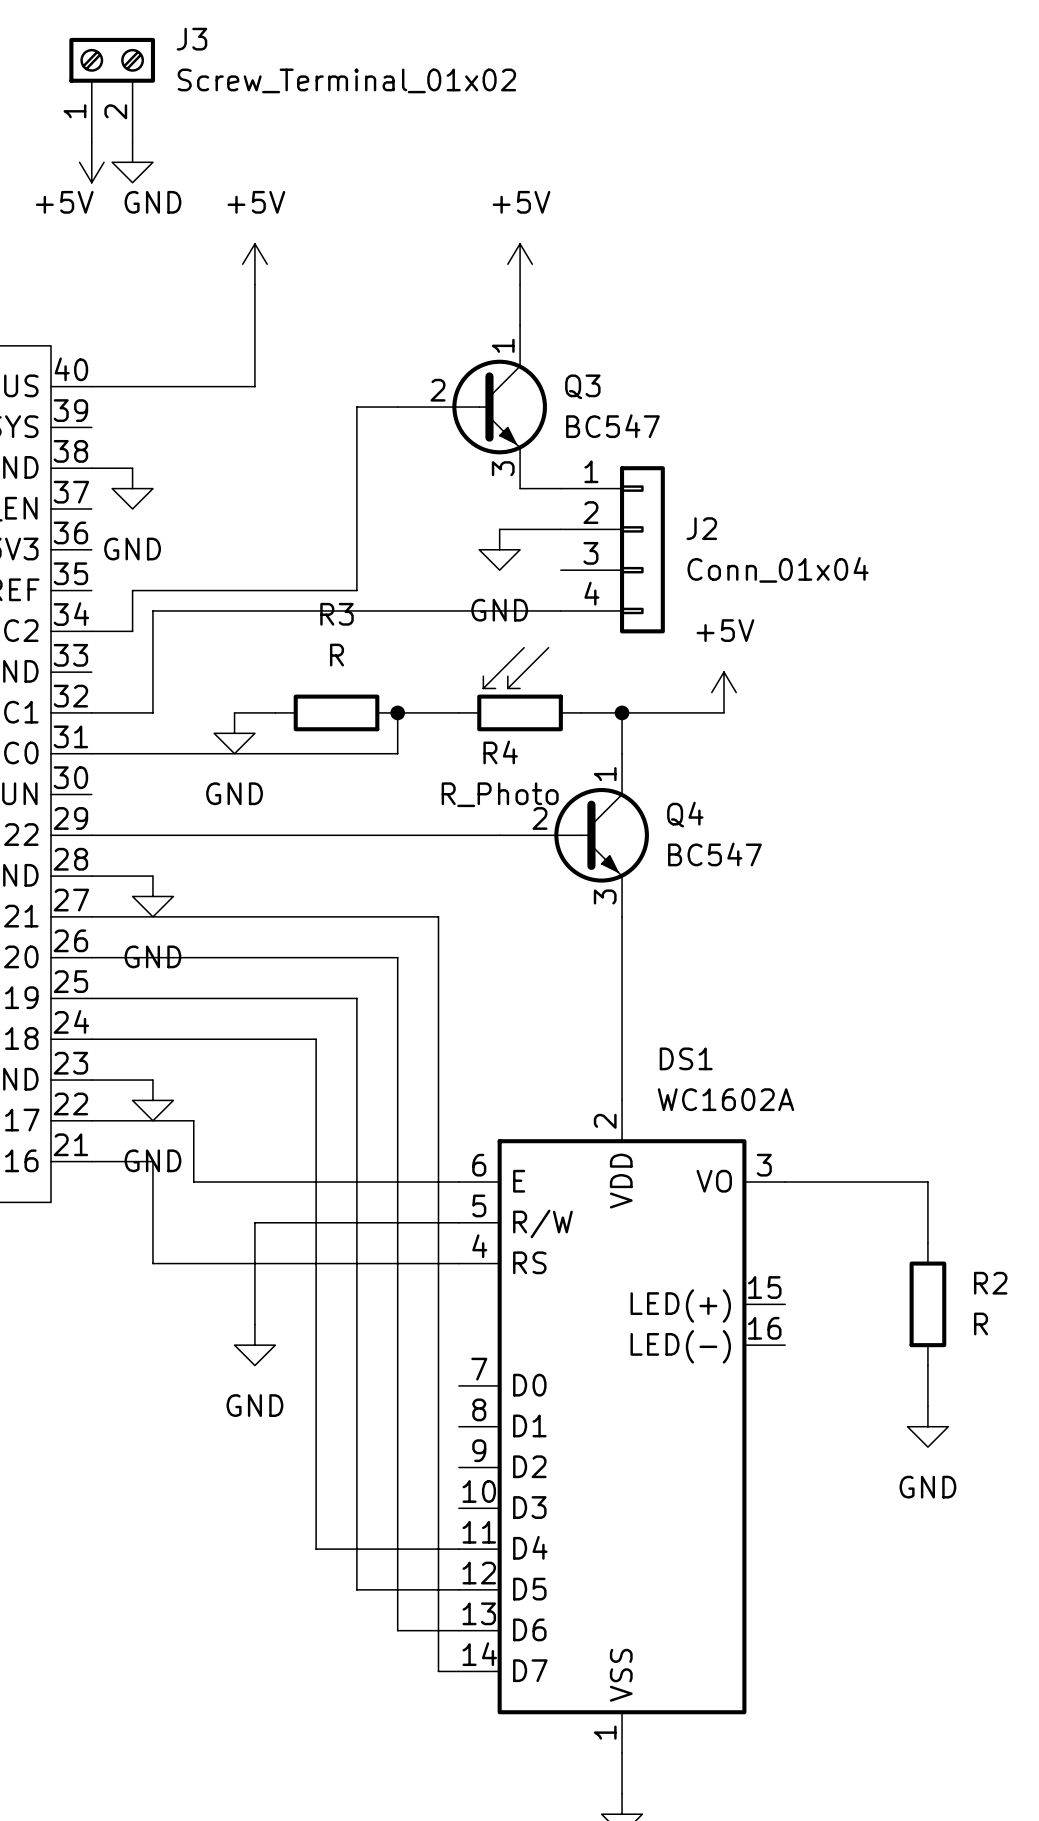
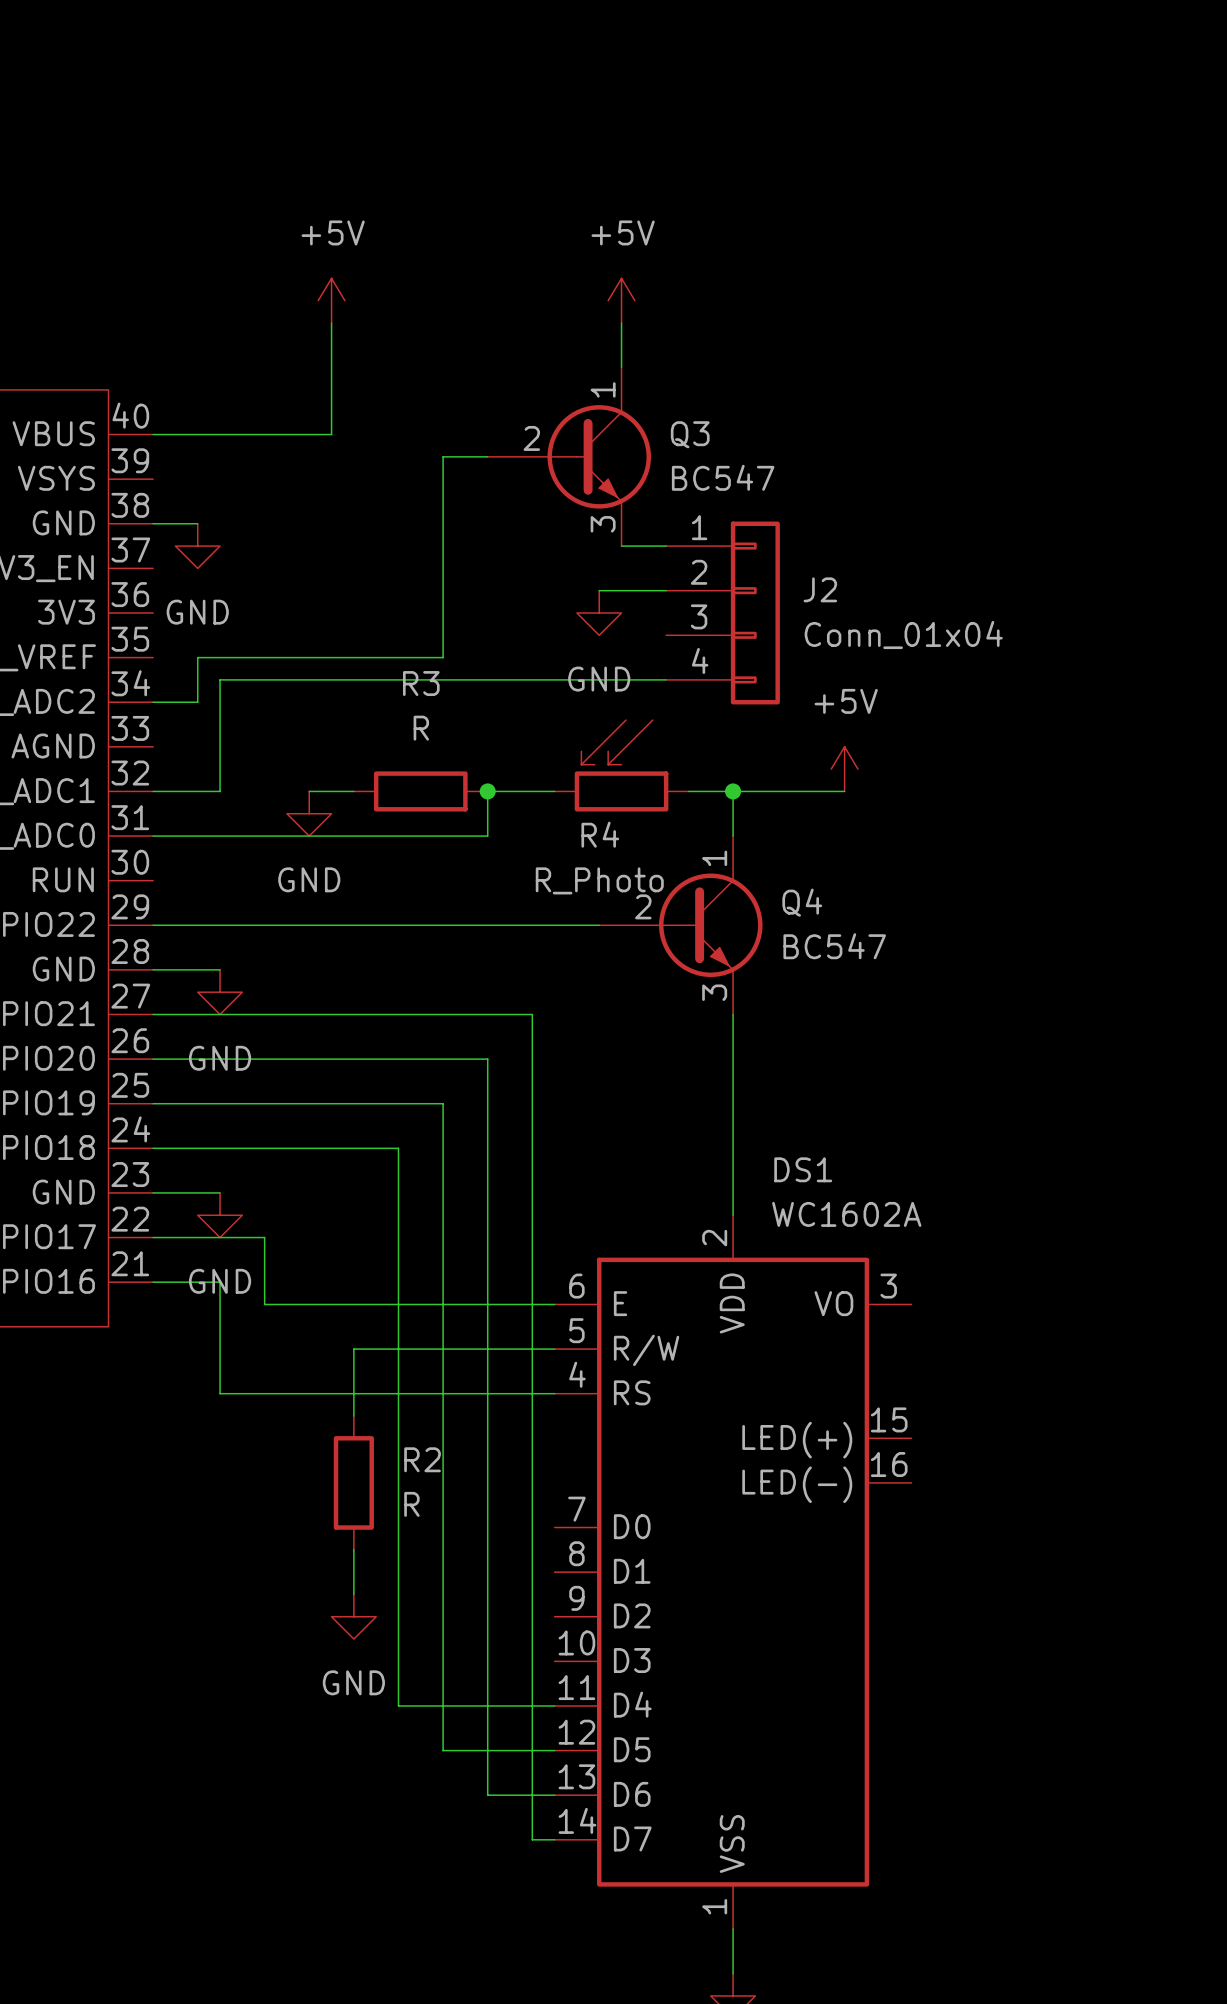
J3: Screw_Terminal_01x02 (112, 89) -> none
power symbol: +5V (91, 162) -> none
power symbol: GND (132, 162) -> none
wire: (785, 1181) (927, 1181) (927, 1243) -> none
wire: (275, 1222) (254, 1222) (254, 1324) -> (353, 1349) (353, 1416)
R2 position: (927, 1304) -> (353, 1482)
power symbol position: GND (254, 1345) -> GND (353, 1616)
wire: (927, 1365) (927, 1406) -> none
wire: none -> (353, 1549) (353, 1594)
power symbol: GND (927, 1426) -> none

